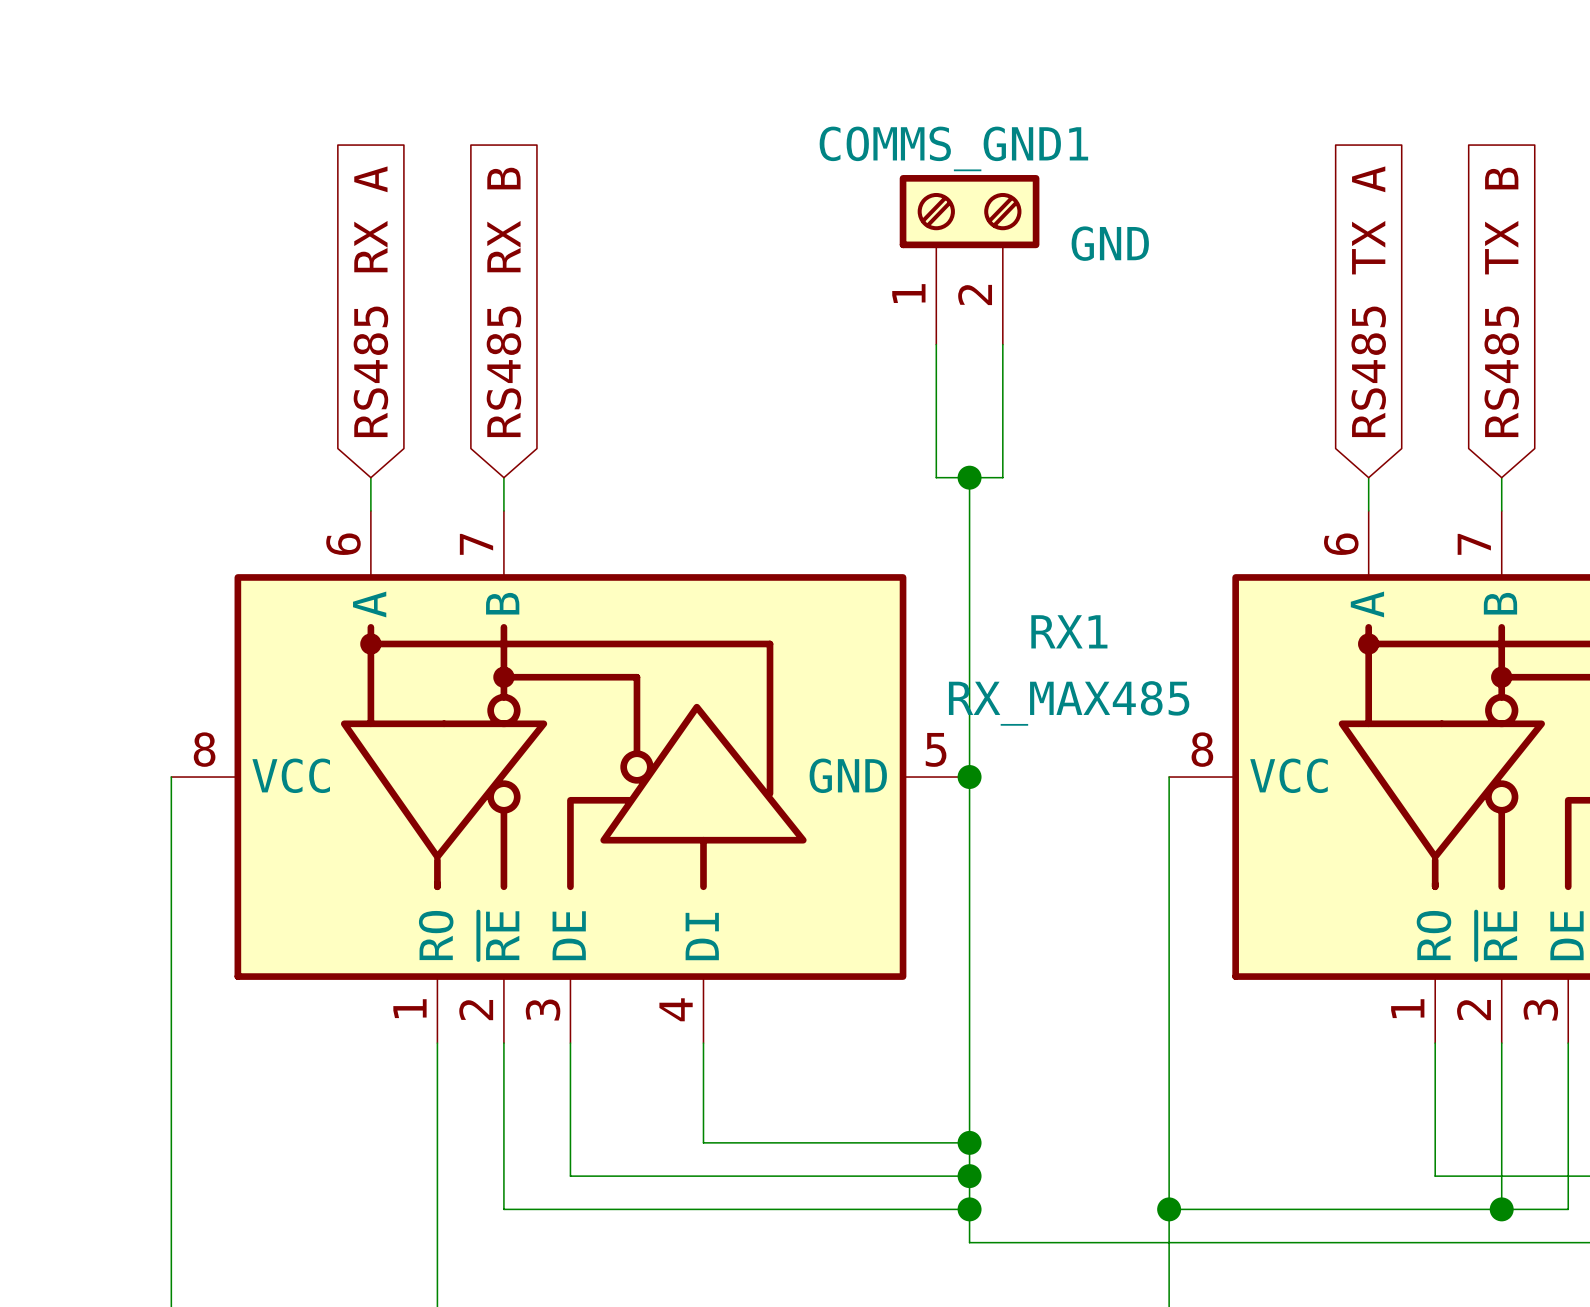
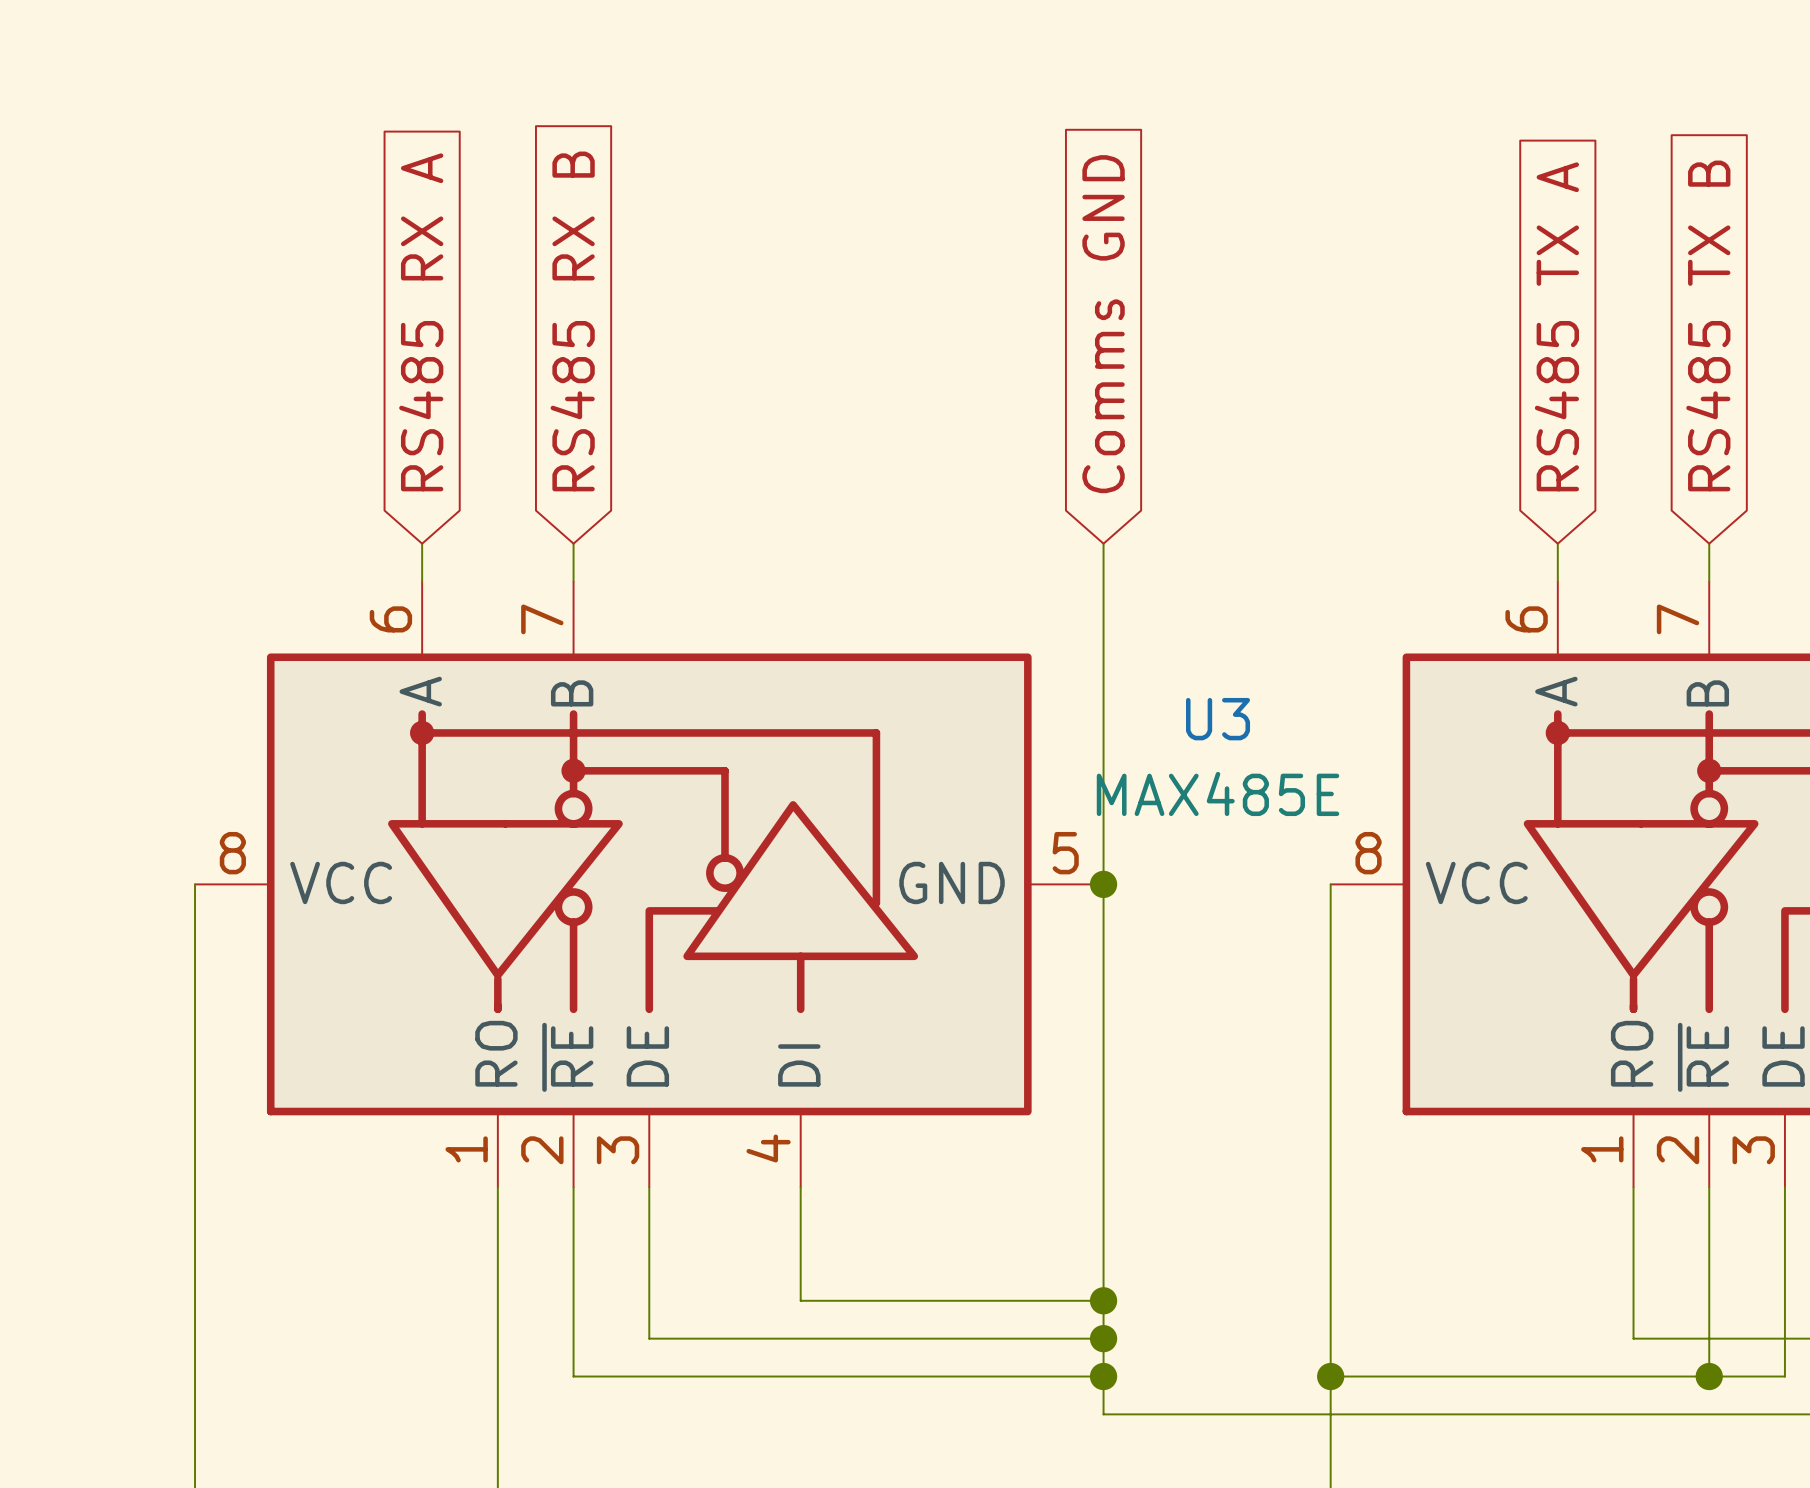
COMMS_GND1: GND (969, 259) -> none
global label: none -> Comms GND (1103, 324)
wire: (936, 344) (936, 477) (1002, 477) (1002, 344) -> none
junction: (969, 477) -> none
RX1 name: RX1 (1069, 631) -> U3 (1218, 719)
RX1 value: RX_MAX485 (1069, 703) -> MAX485E (1218, 793)

